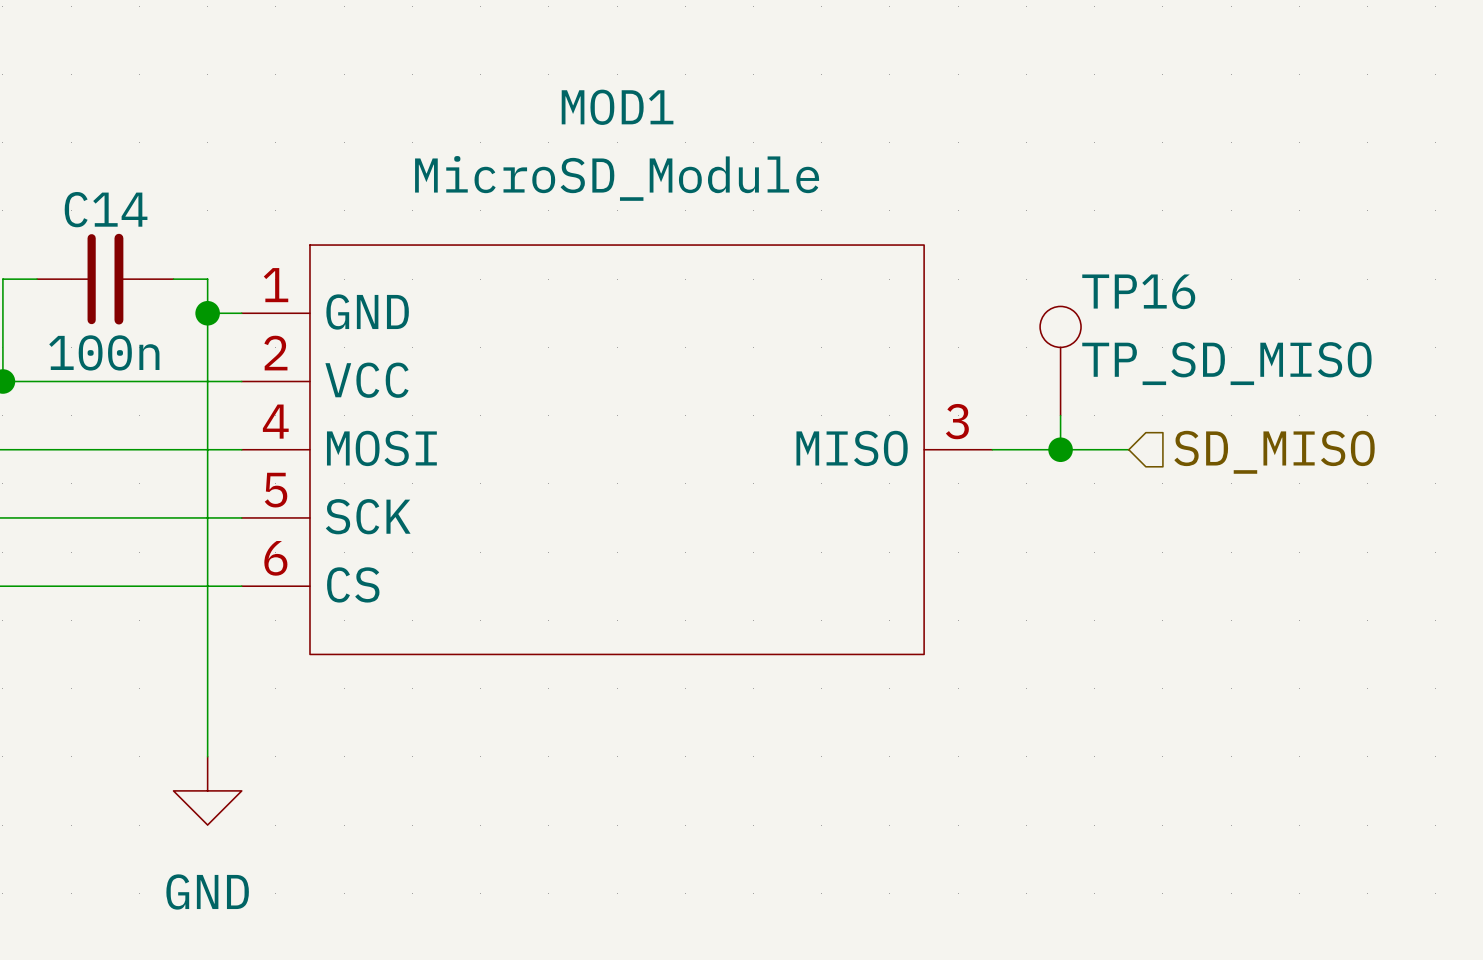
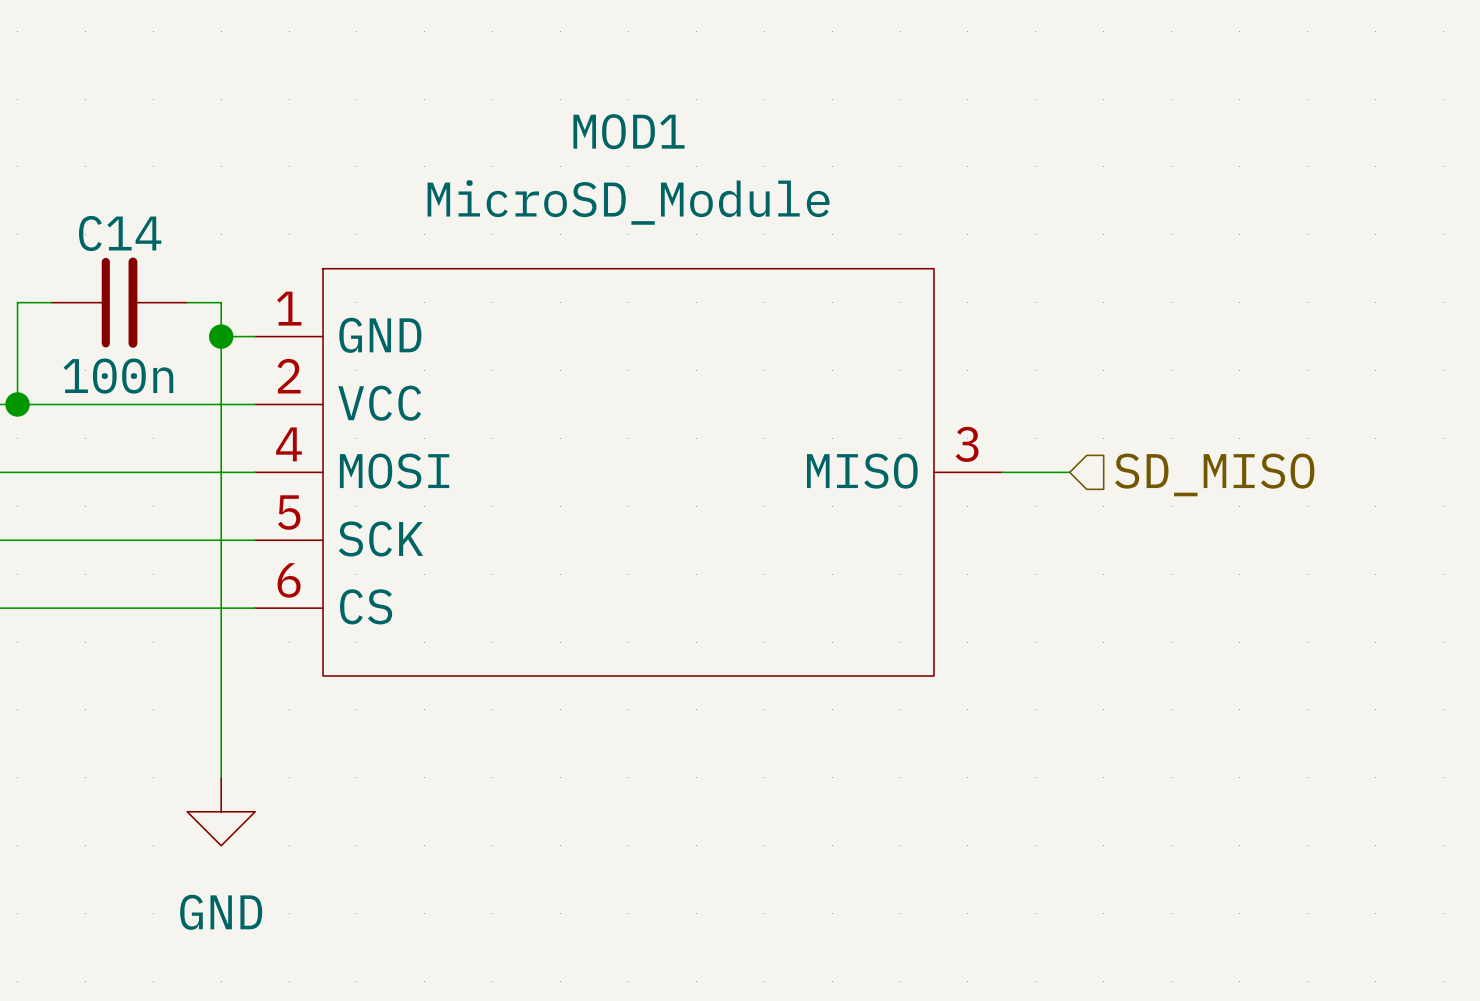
TP16: TP_SD_MISO (1060, 361) -> none
wire: (1060, 415) (1060, 449) (1128, 449) -> none
junction: (1060, 449) -> none
hierarchical label position: SD_MISO (1274, 452) -> SD_MISO (1214, 474)

